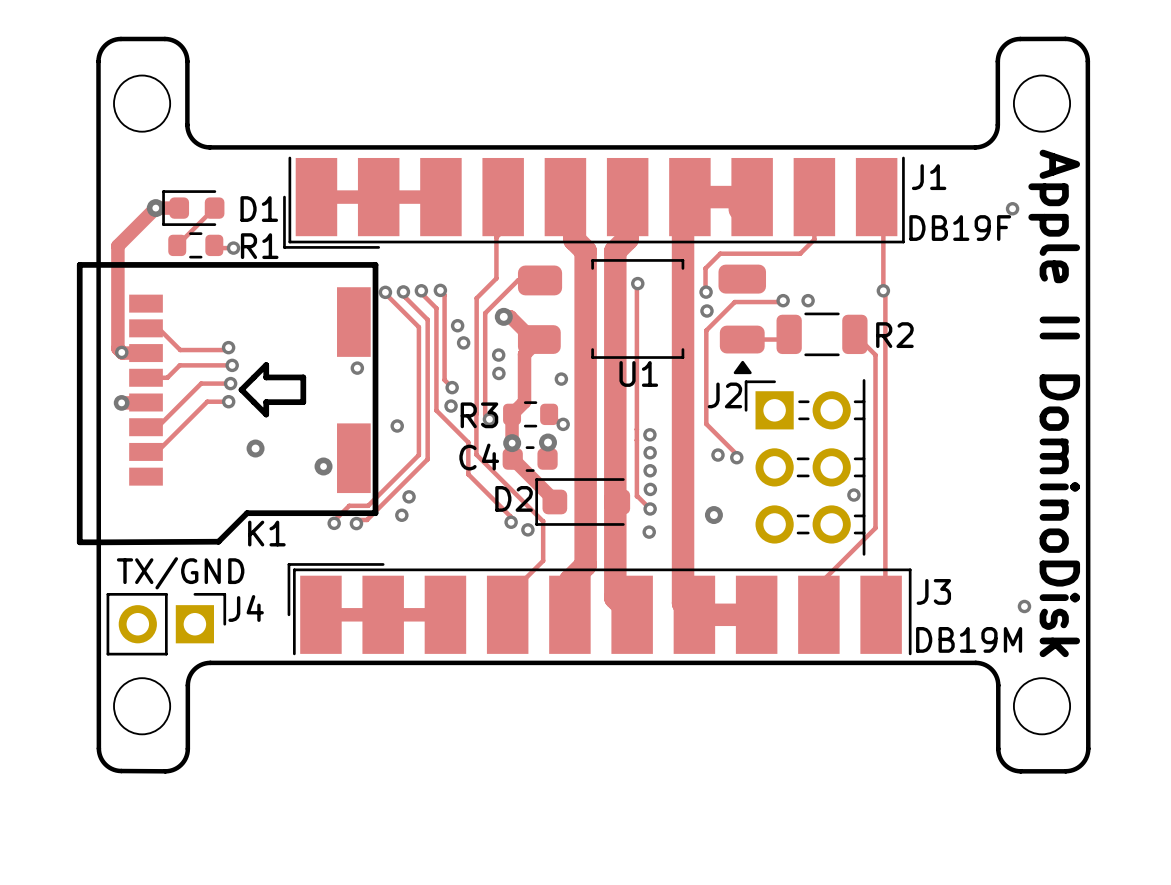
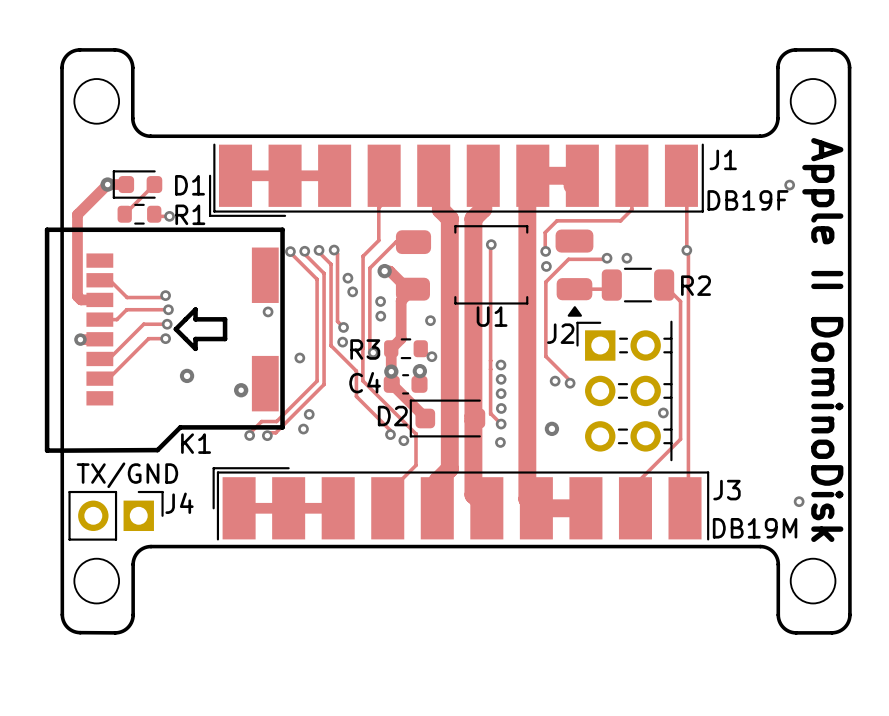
via: (121, 352) -> none

